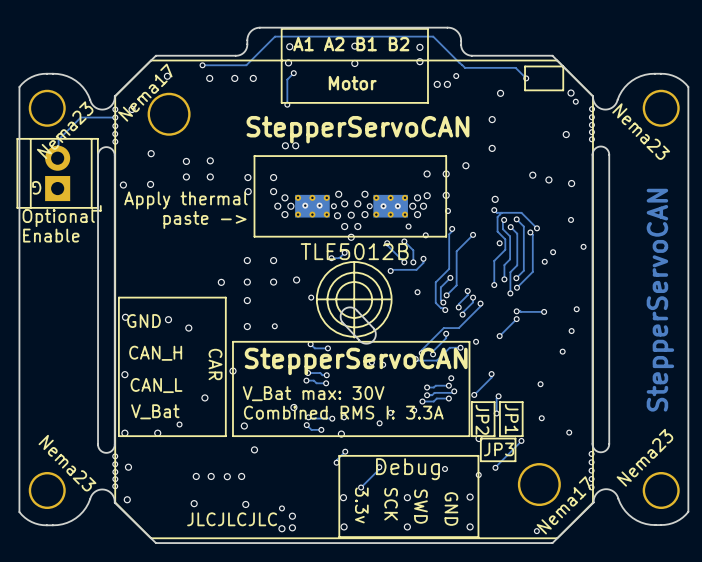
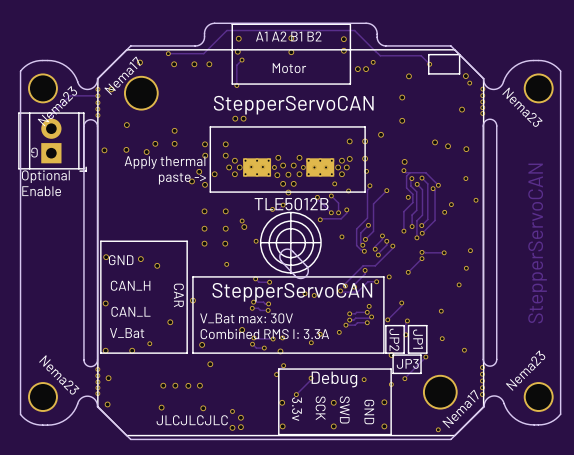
via position: (186, 161) -> (146, 152)
via: none -> (199, 171)
via: none -> (214, 174)
via: none -> (191, 181)
via: none -> (205, 184)
via: none -> (242, 220)
via: (221, 282) -> none
via: none -> (225, 243)
via: (247, 326) -> none

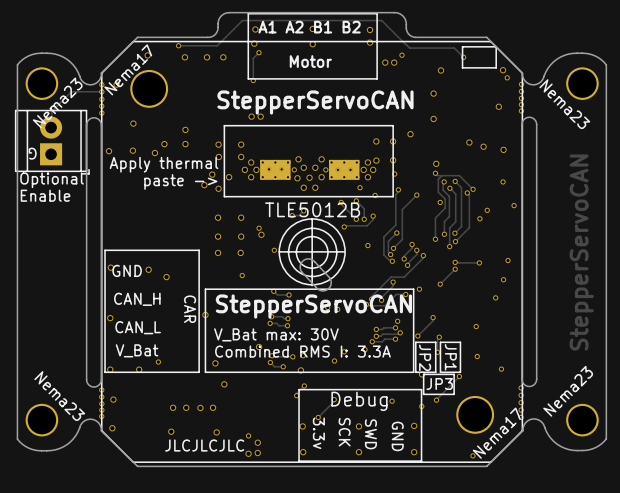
via: (288, 192) -> none
via: (170, 322) -> none

